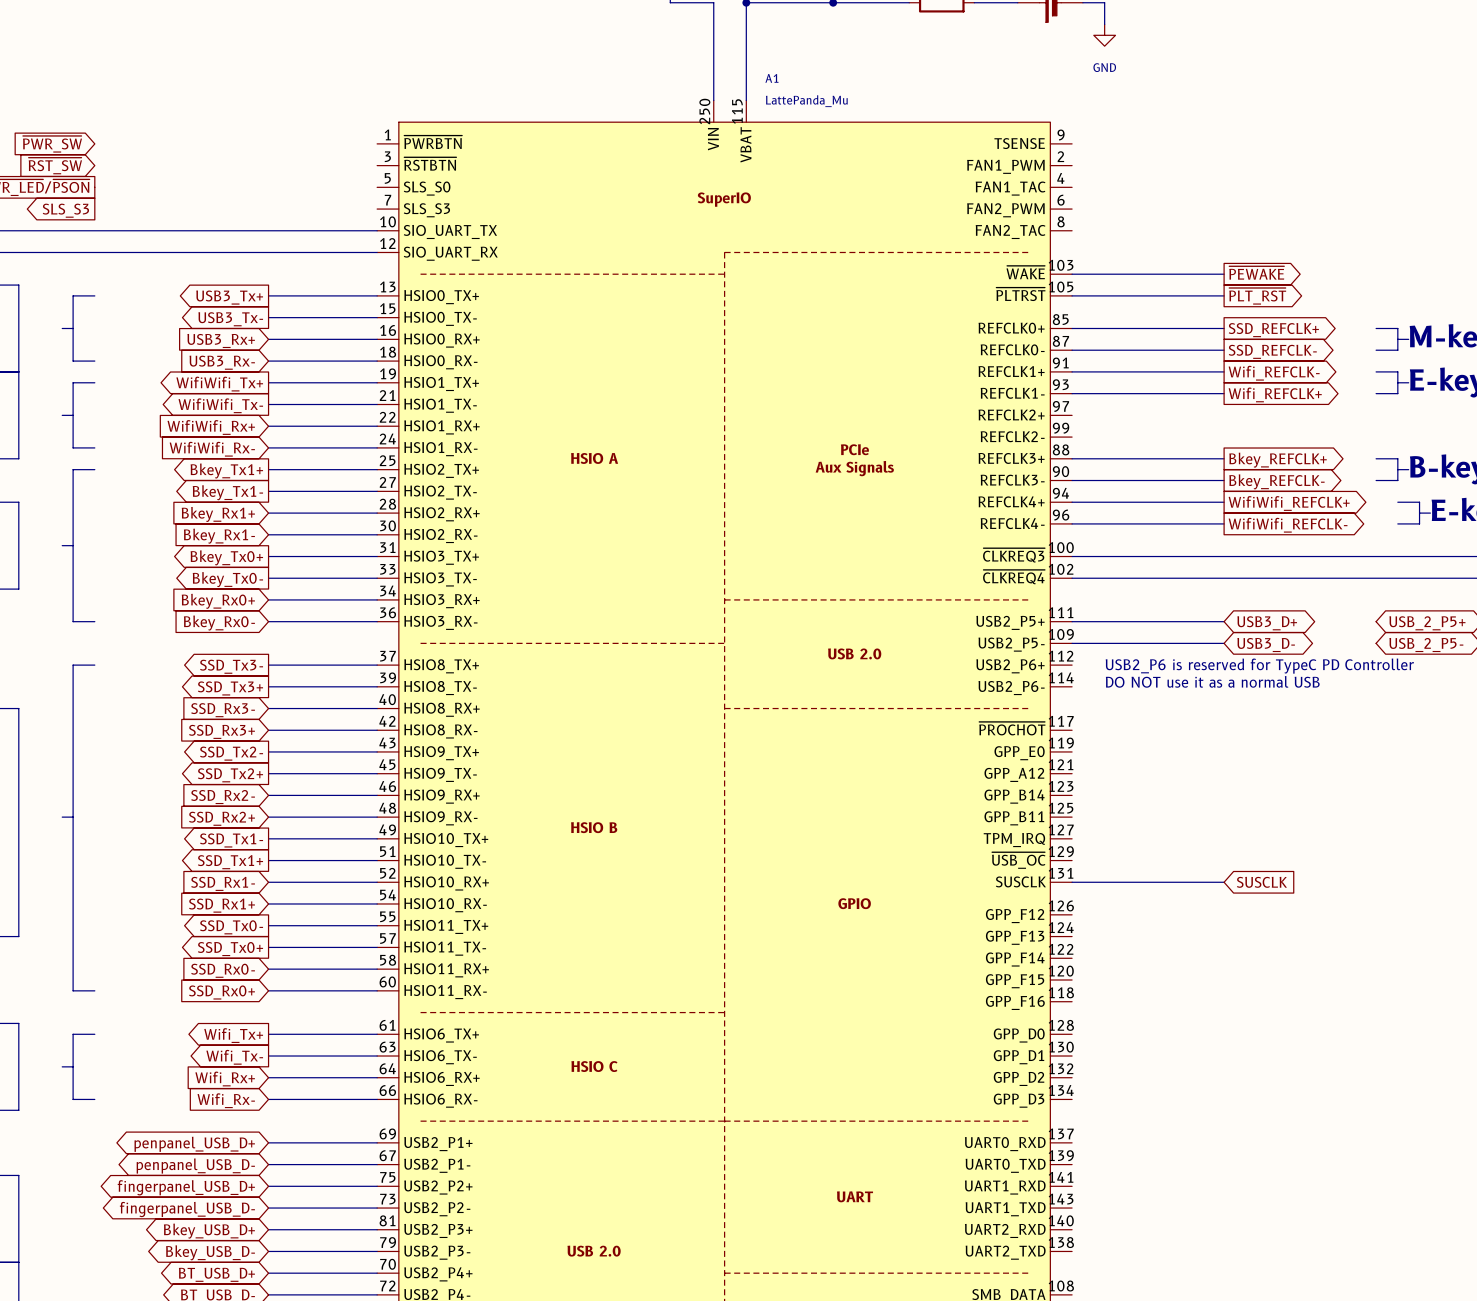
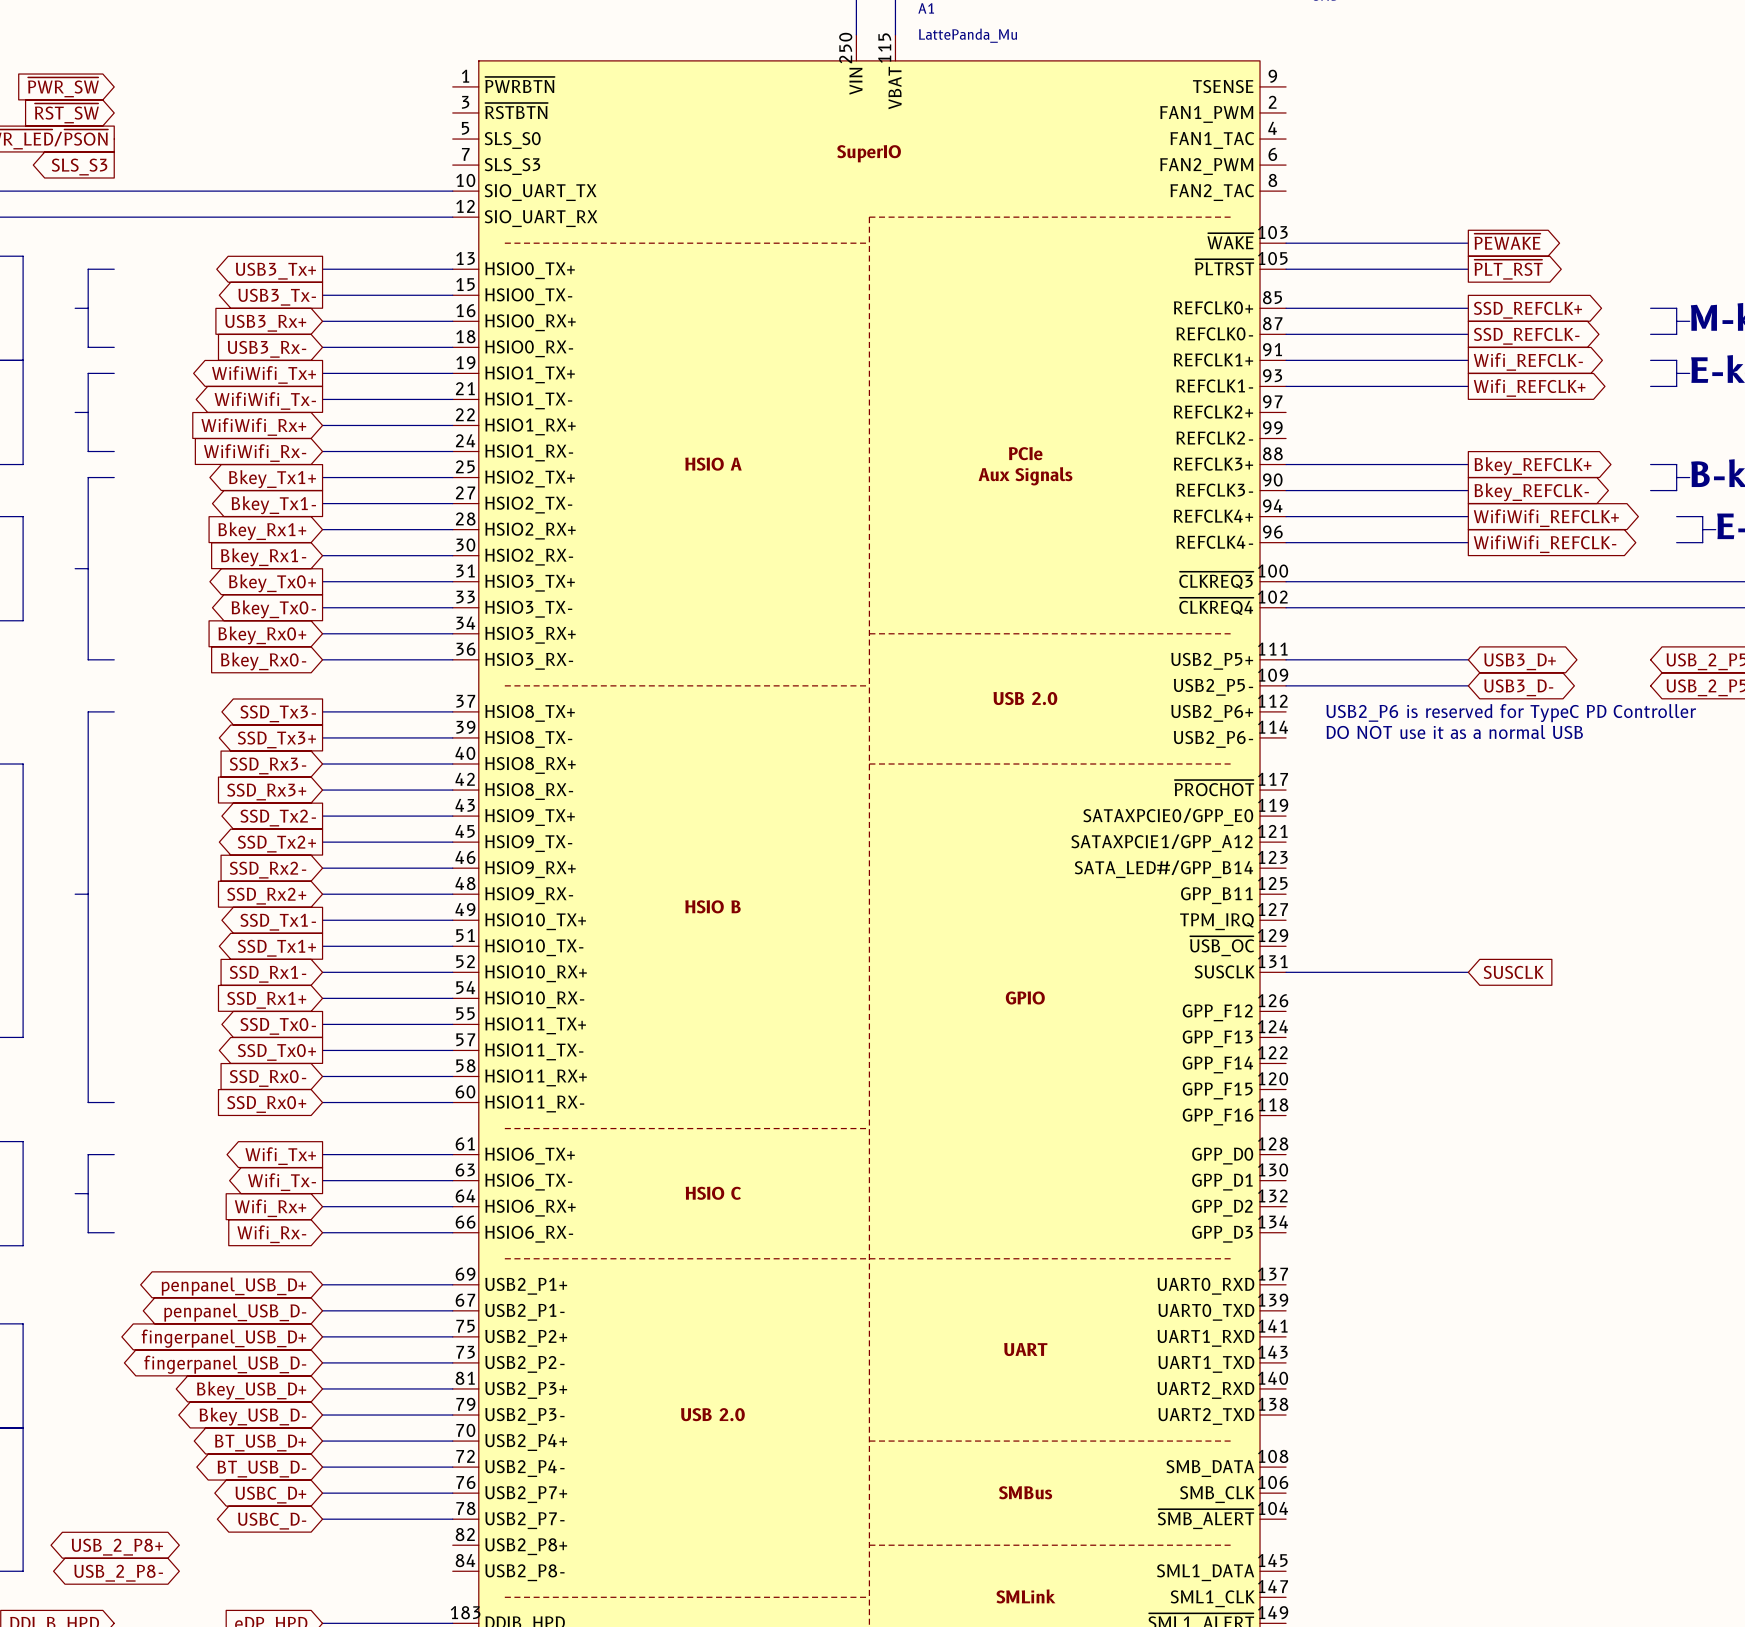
A1 pin name: GPP_E0 (1019, 753) -> SATAXPCIE0/GPP_E0 (1168, 817)
A1 pin name: GPP_A12 (1014, 774) -> SATAXPCIE1/GPP_A12 (1162, 843)
A1 pin name: GPP_B14 (1014, 796) -> SATA_LED#/GPP_B14 (1163, 869)

